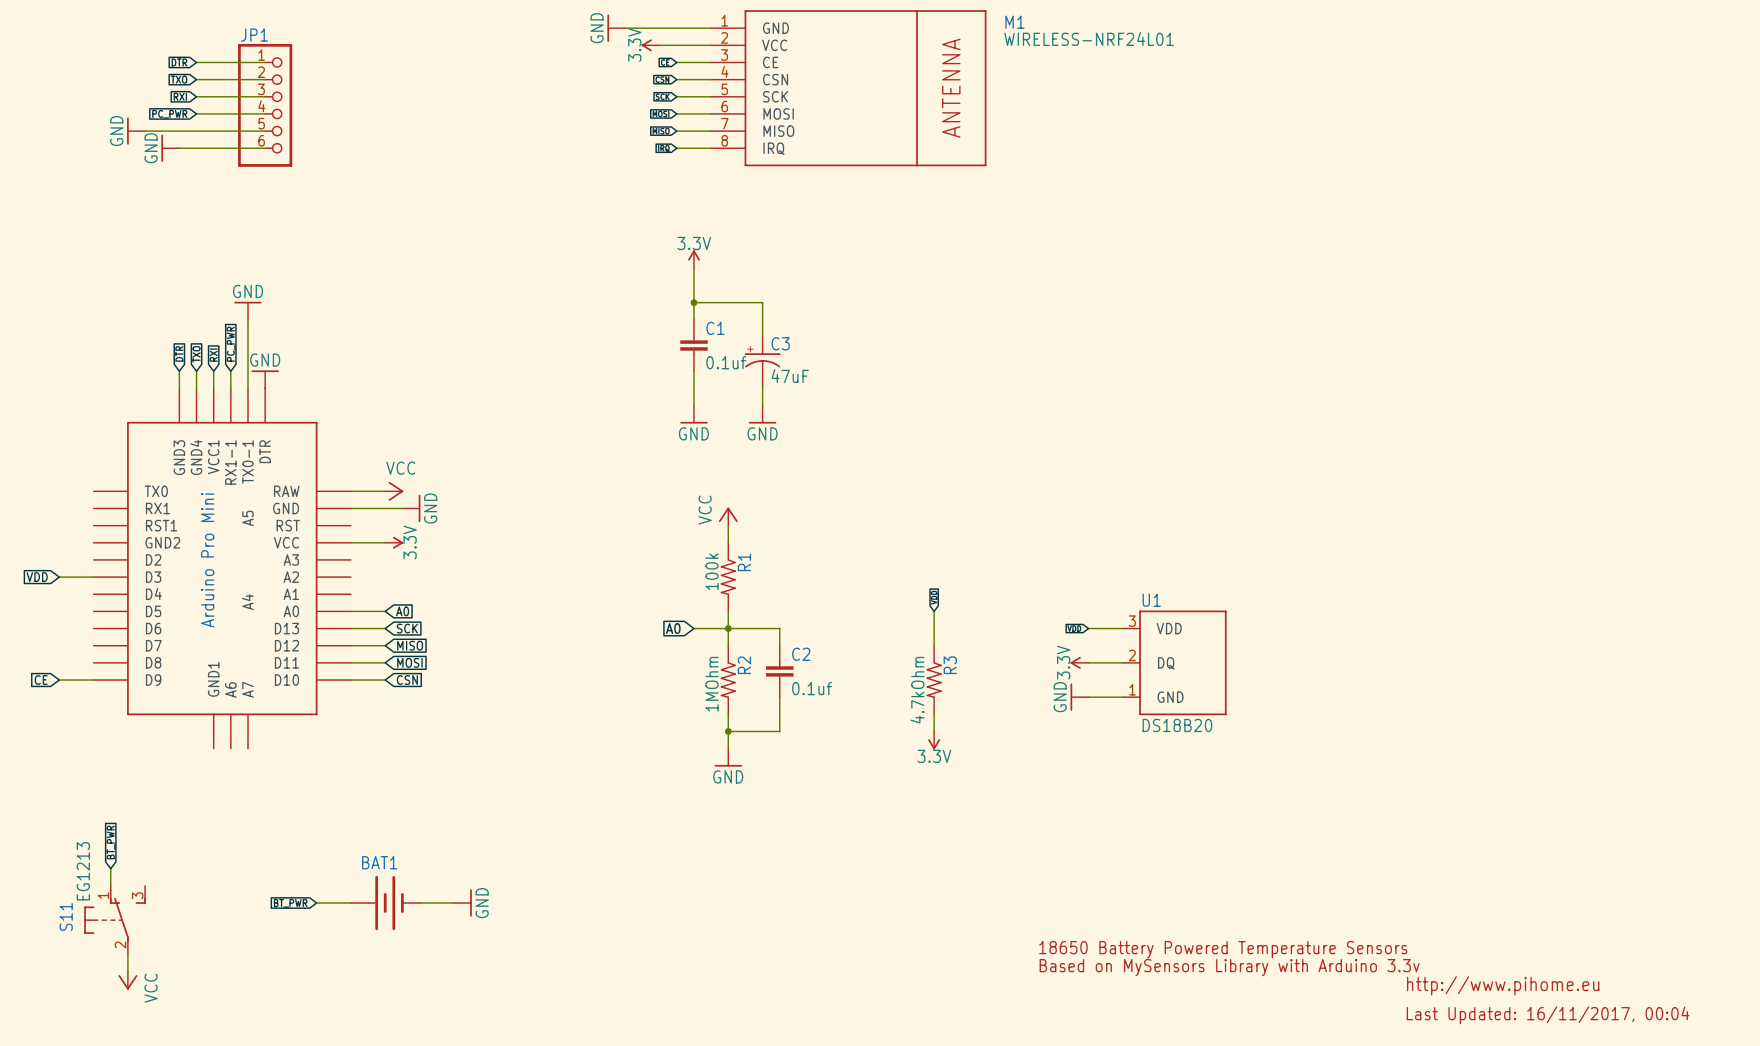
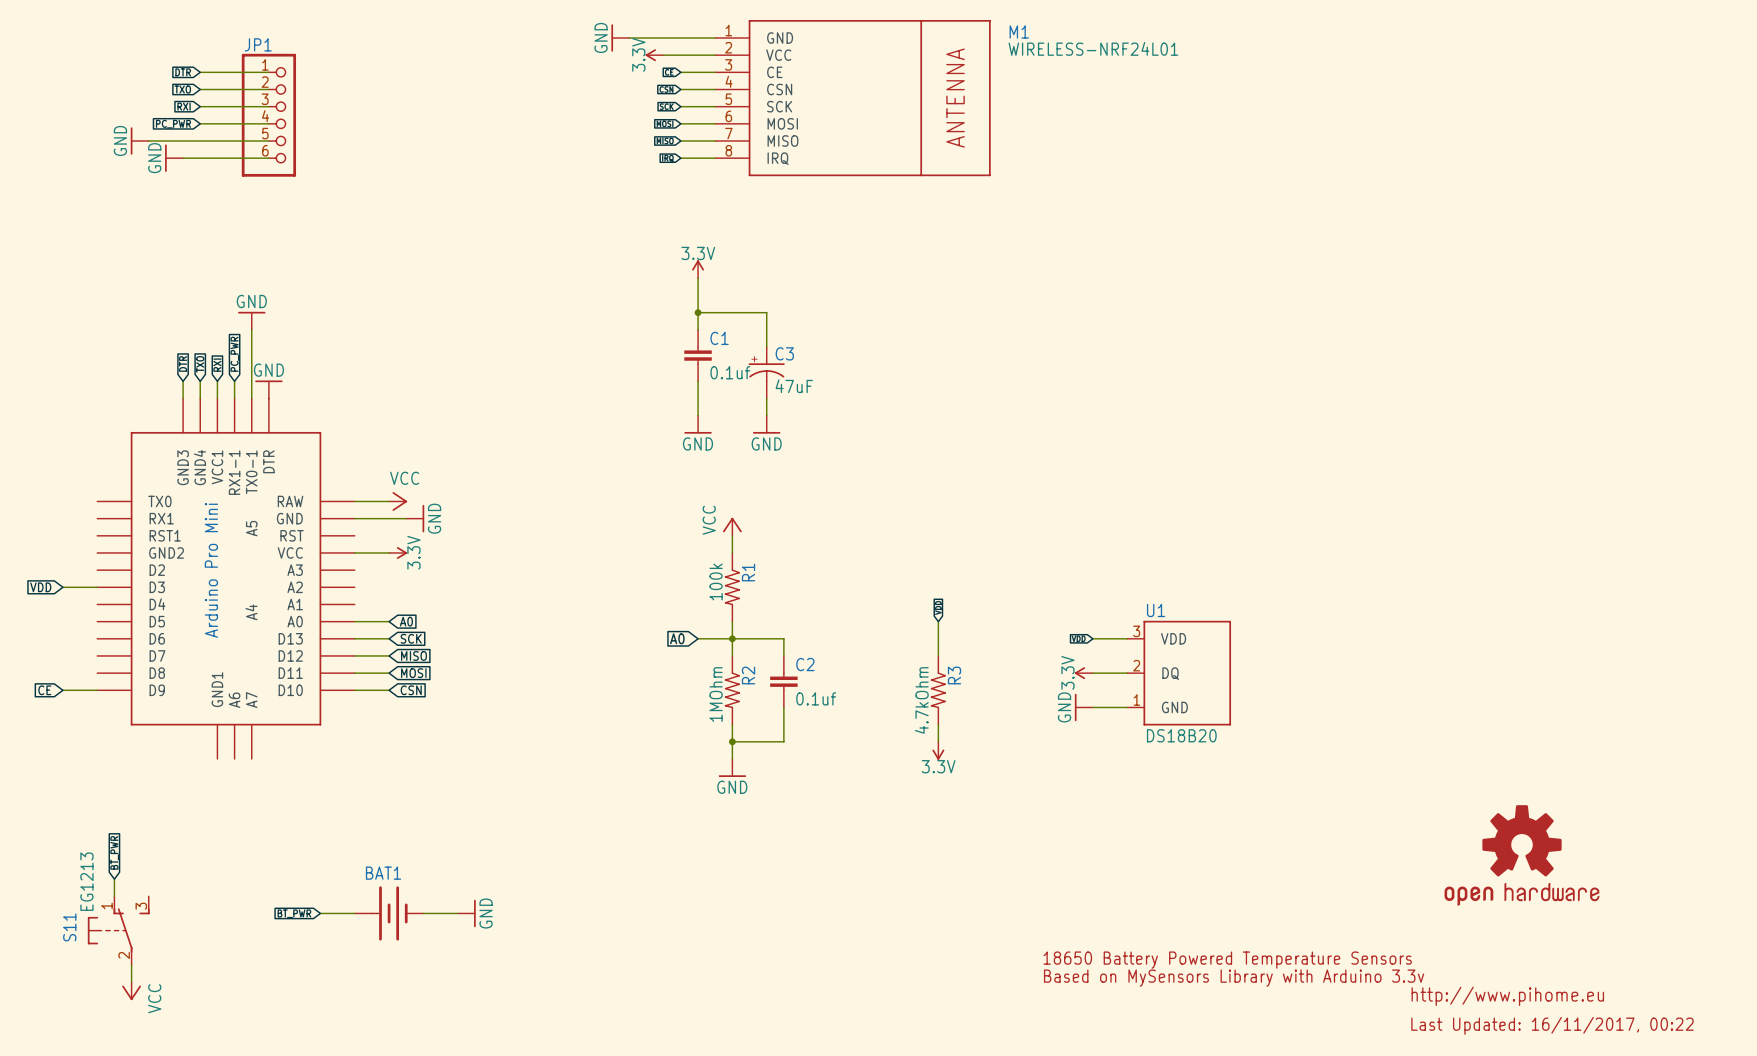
part: none -> (1521, 855)
text: Last Updated: 16/11/2017, 00:04 (1548, 1015) -> Last Updated: 16/11/2017, 00:22 (1552, 1025)

